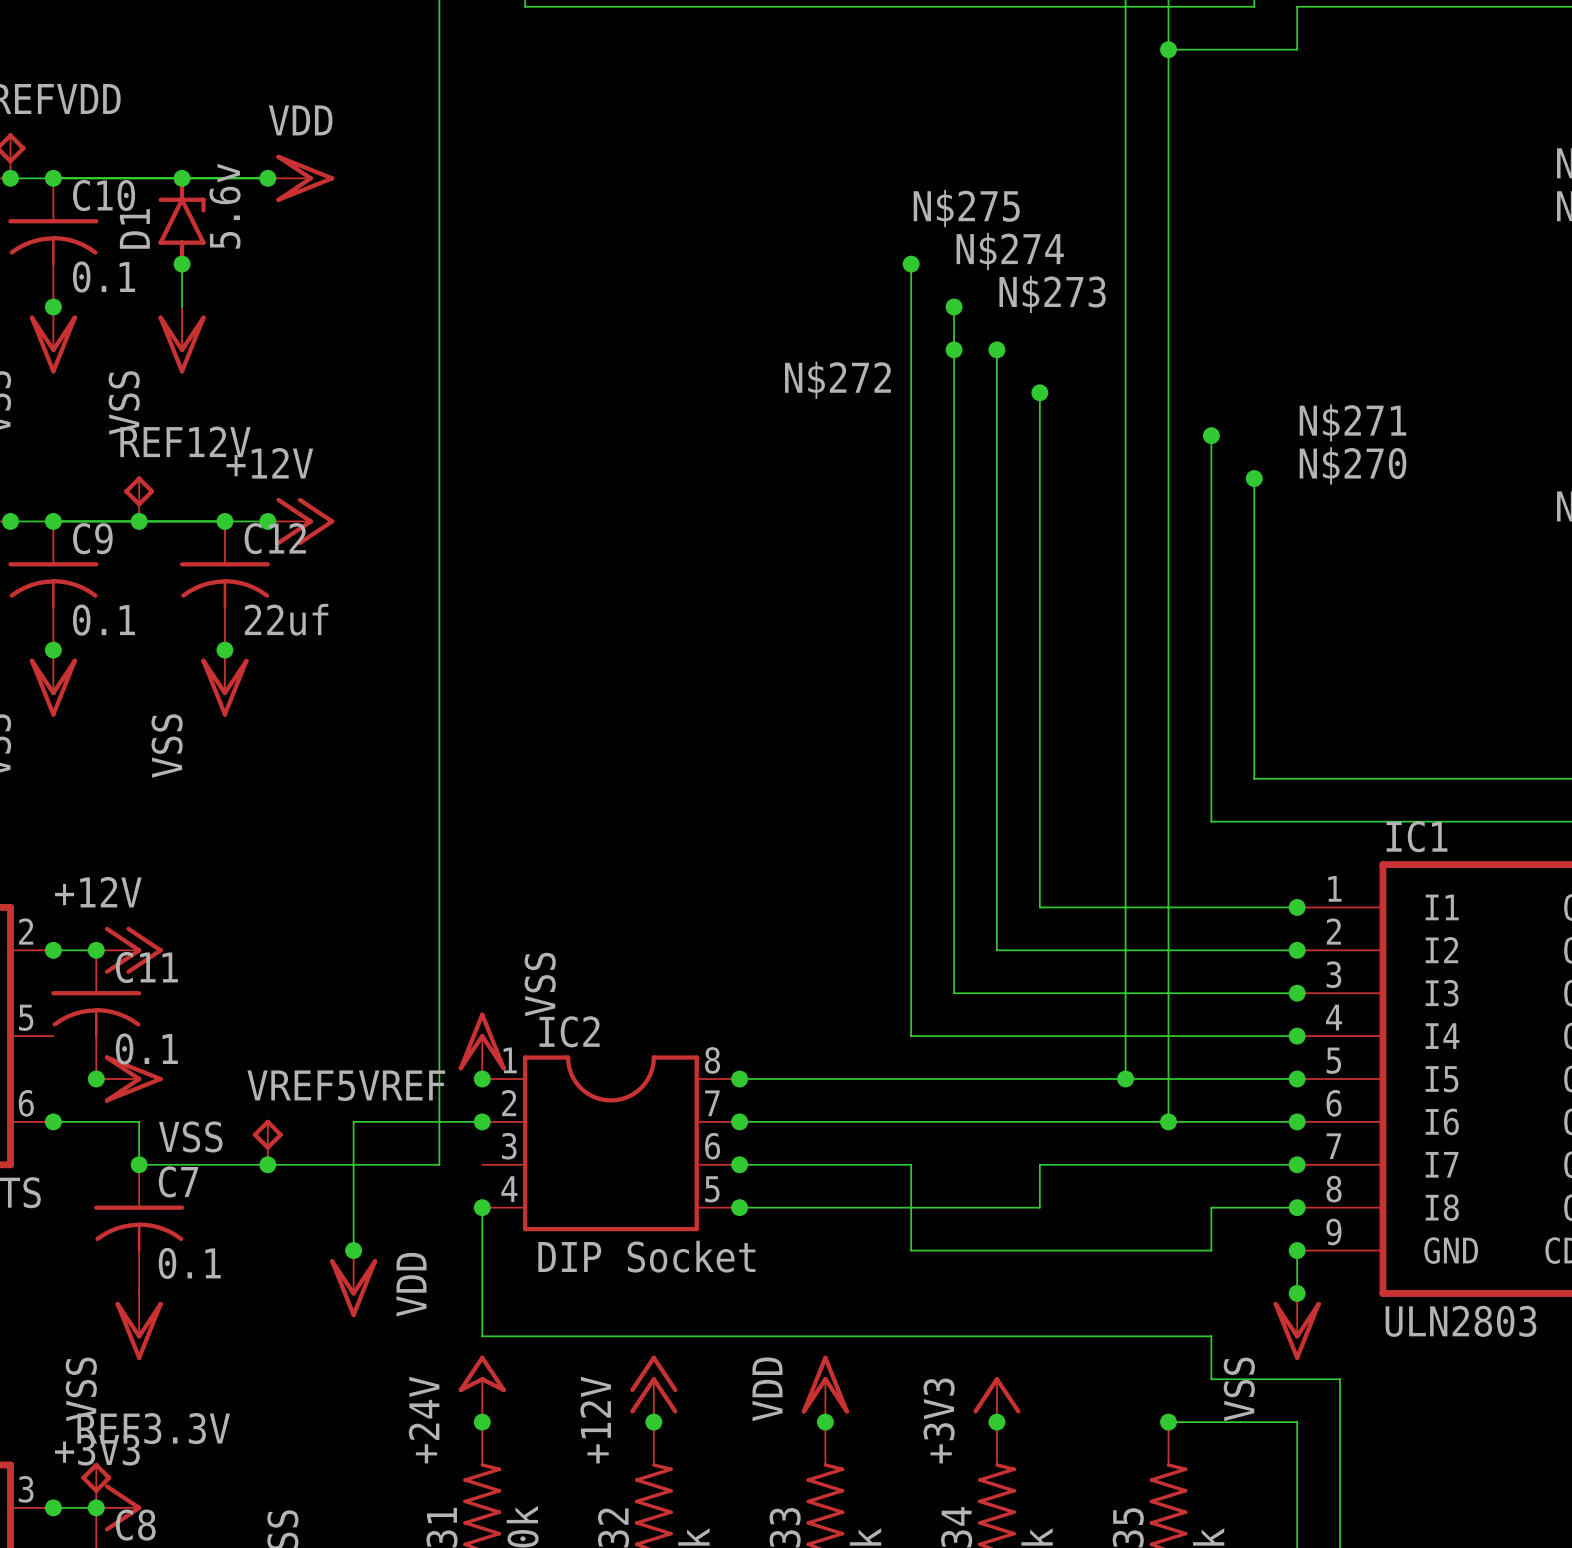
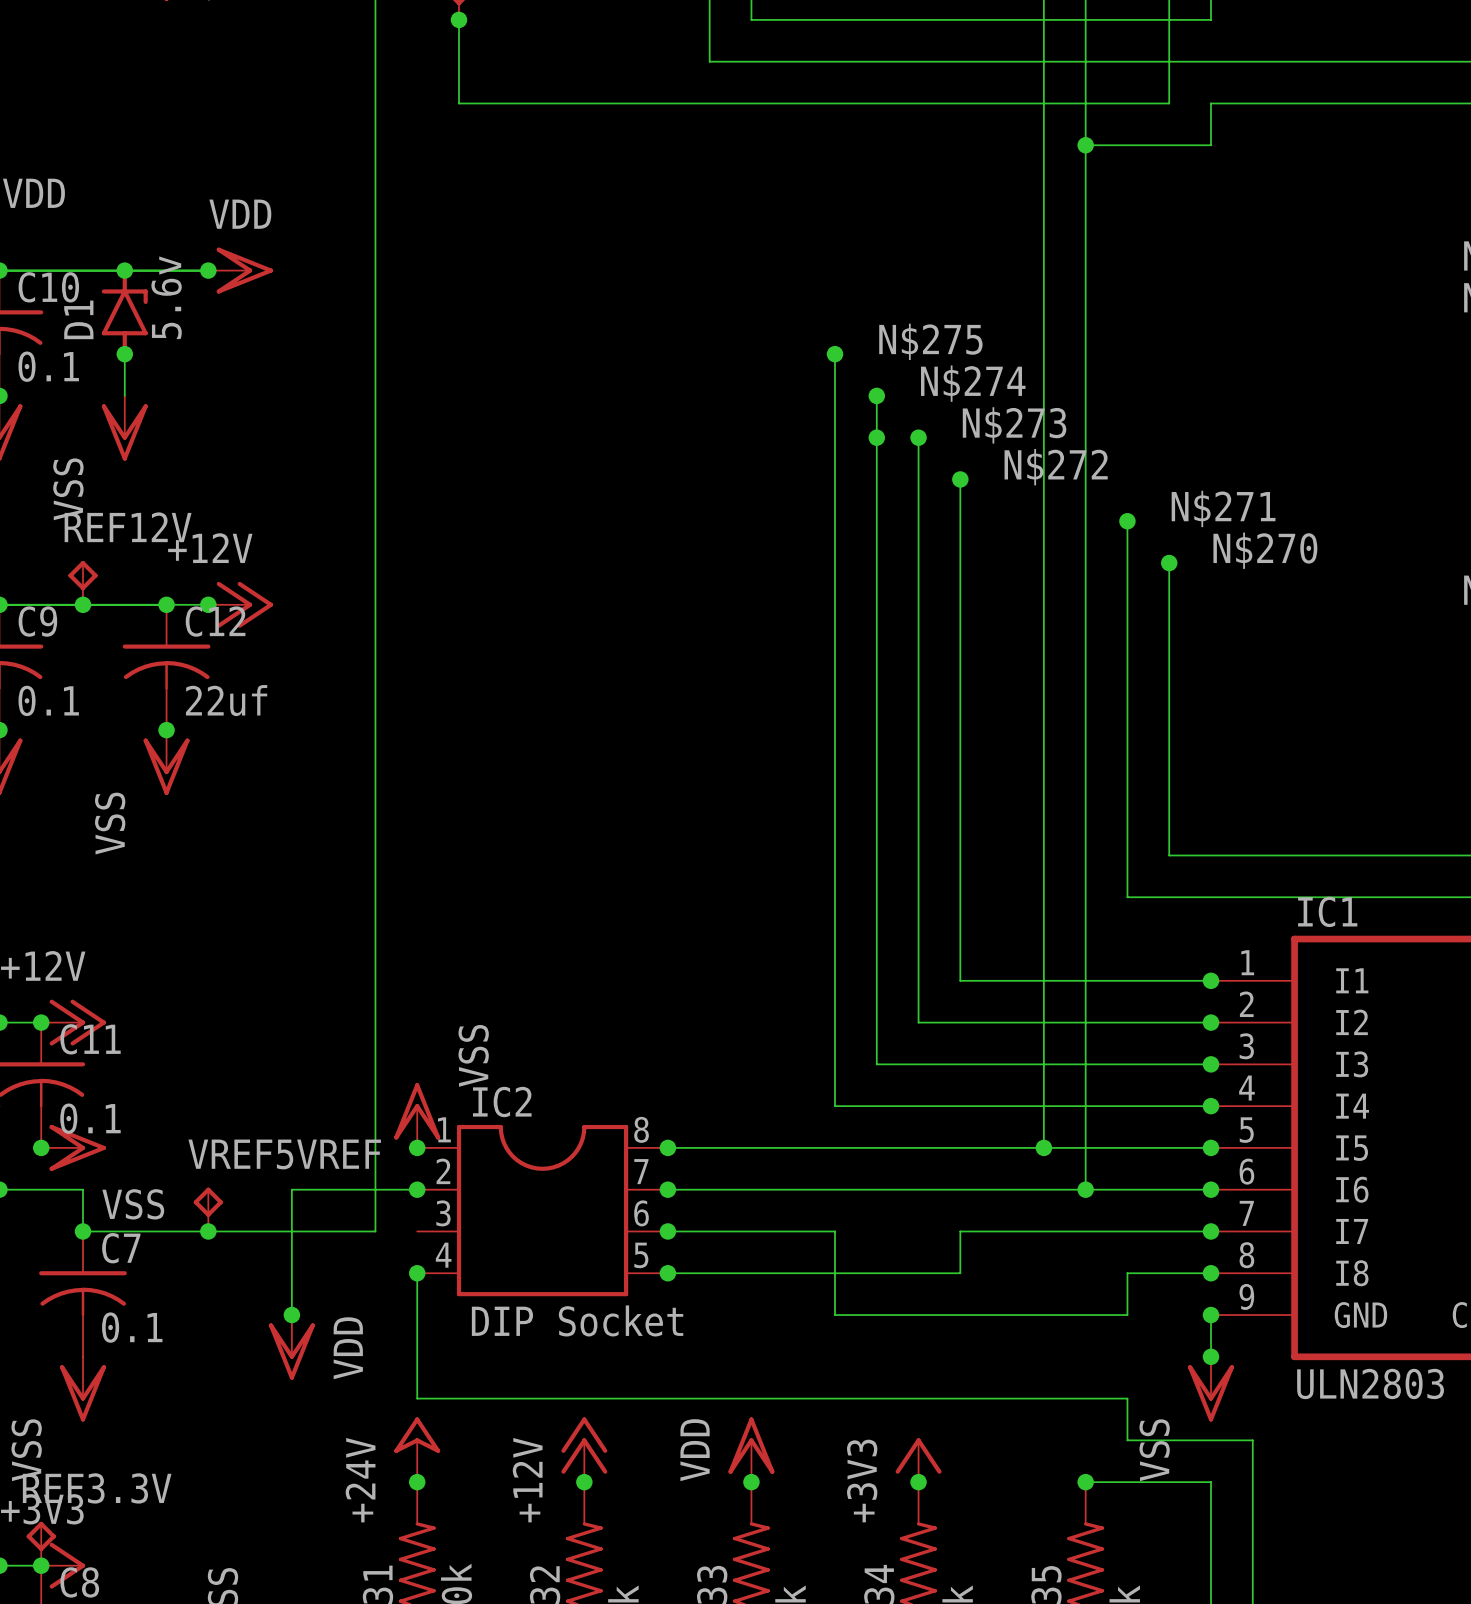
label: N$275 (966, 208) -> none
label: N$274 (1010, 251) -> N$275 (930, 341)
label: N$273 (1052, 294) -> N$274 (973, 383)
label: none -> N$273 (1014, 425)
label position: N$272 (837, 380) -> N$272 (1056, 467)
label position: N$271 (1352, 423) -> N$271 (1223, 508)

